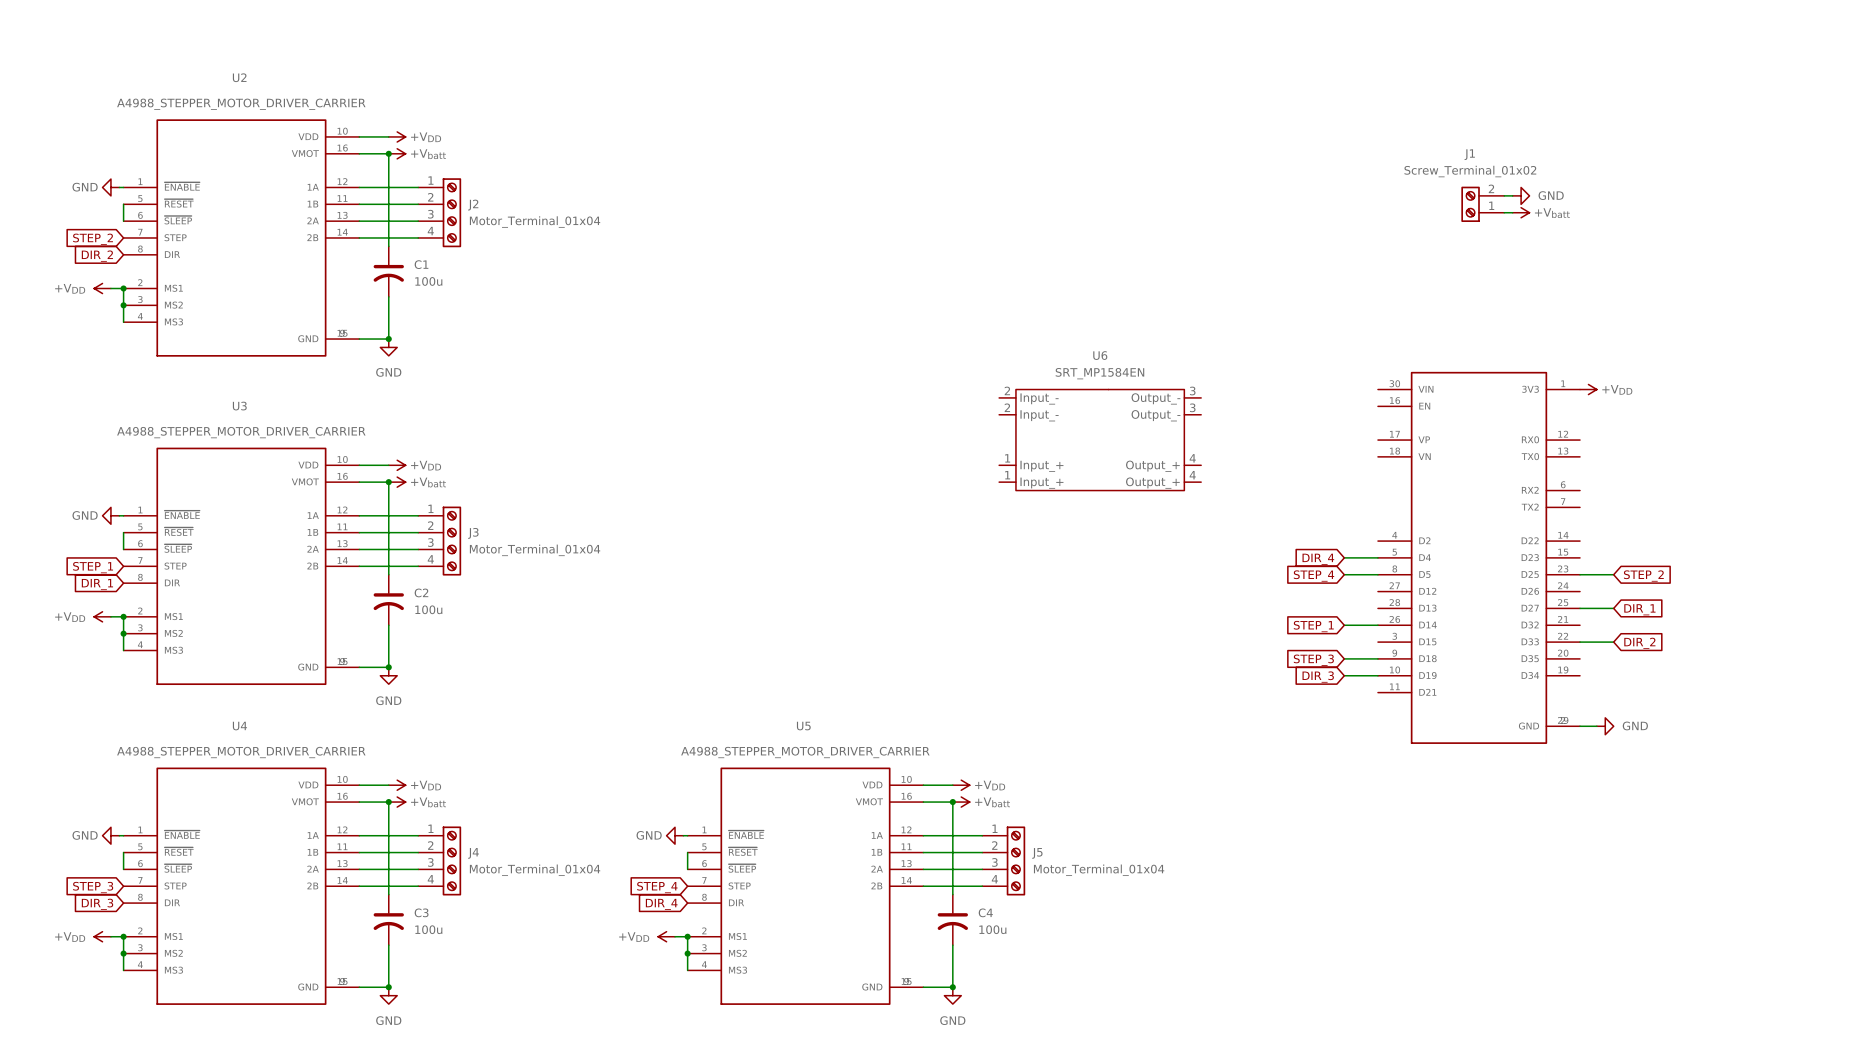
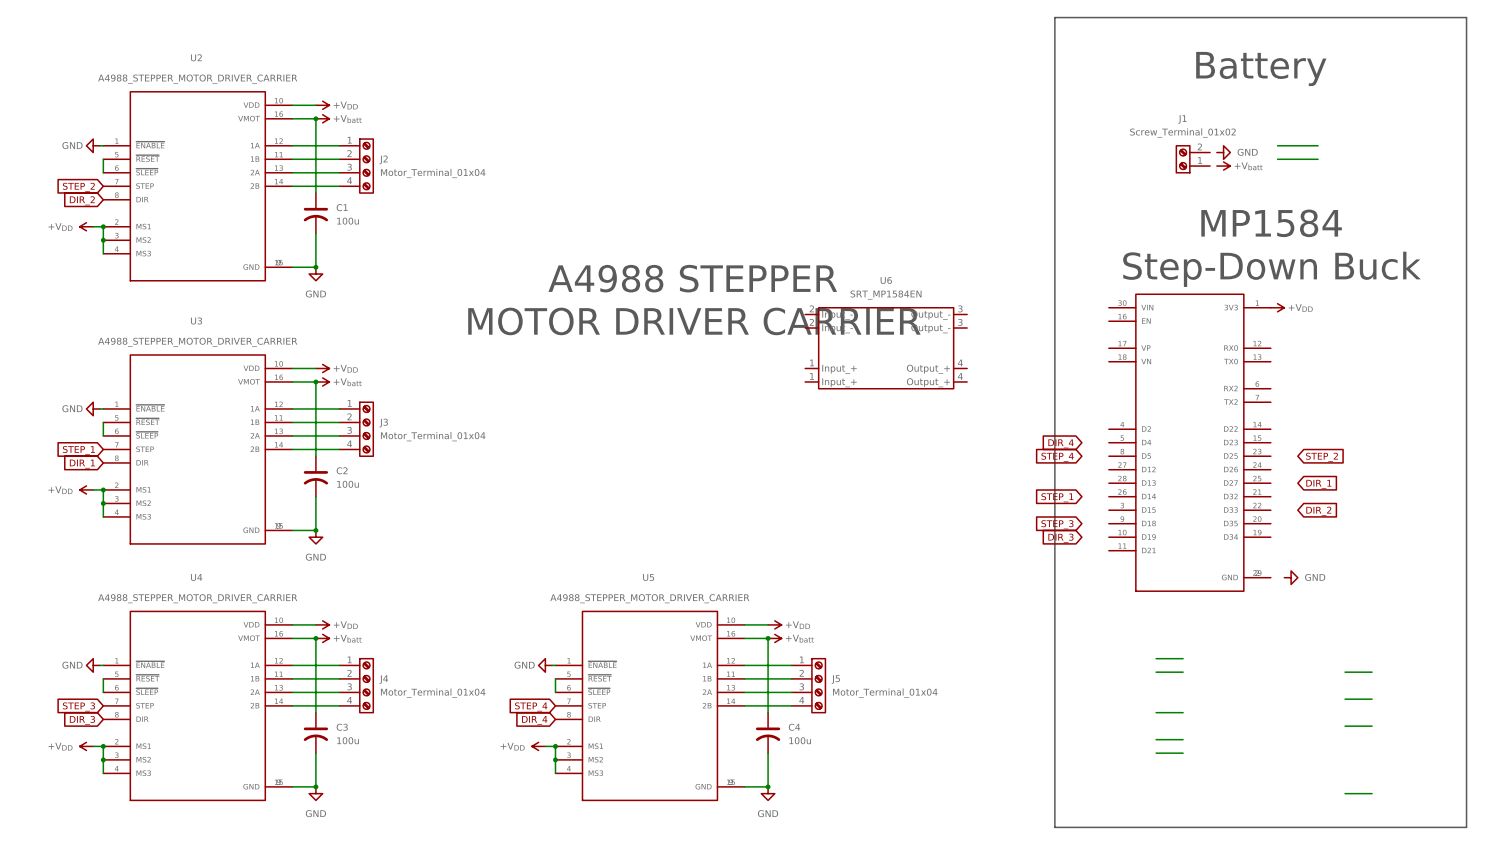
line: none -> (1054, 17) (1466, 17) (1466, 827) (1054, 827) (1054, 17)
text: none -> Battery (1261, 68)
wire: none -> (1277, 145) (1318, 145)
wire: (1504, 195) (1512, 195) -> none
wire: none -> (1277, 159) (1318, 159)
wire: (1504, 212) (1512, 212) -> none
text: none -> MP1584 (1271, 223)
text: none -> Step-Down Buck (1271, 269)
text: none -> A4988 STEPPER (692, 278)
text: none -> MOTOR DRIVER CARRIER (694, 321)
wire: (1344, 557) (1377, 557) -> none
wire: (1344, 574) (1377, 574) -> none
wire: (1580, 574) (1613, 574) -> none
wire: (1580, 608) (1613, 608) -> none
wire: (1344, 625) (1377, 625) -> none
wire: (1580, 642) (1613, 642) -> none
wire: (1344, 658) (1377, 658) -> none
wire: (1344, 675) (1377, 675) -> none
wire: (1580, 726) (1596, 726) -> none
wire: none -> (1156, 658) (1183, 658)
wire: none -> (1156, 672) (1183, 672)
wire: none -> (1345, 672) (1372, 672)
wire: none -> (1345, 699) (1372, 699)
wire: none -> (1156, 712) (1183, 712)
wire: none -> (1345, 726) (1372, 726)
wire: none -> (1156, 739) (1183, 739)
wire: none -> (1156, 753) (1183, 753)
wire: none -> (1345, 793) (1372, 793)

